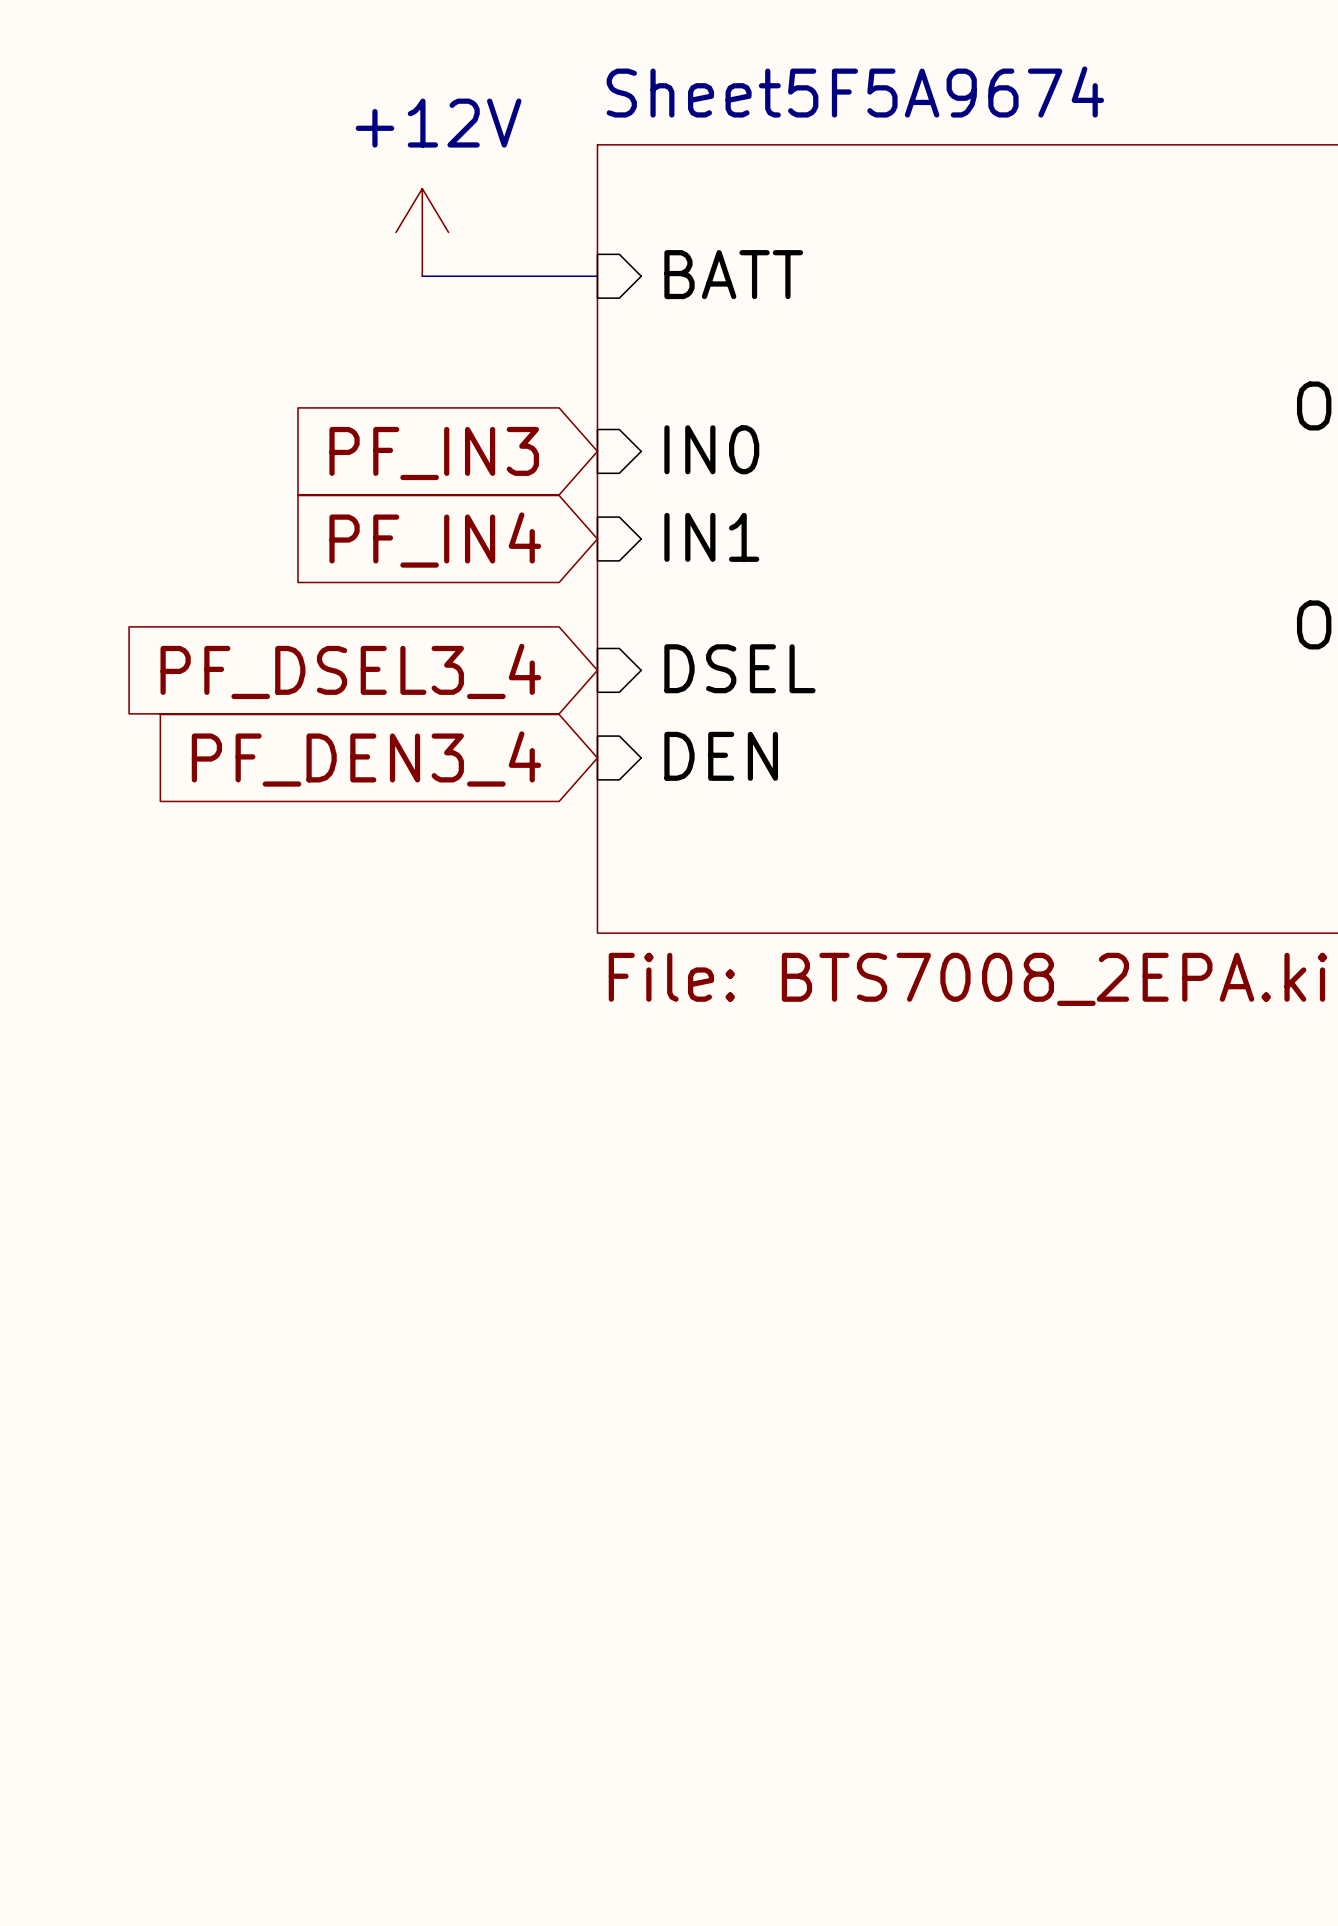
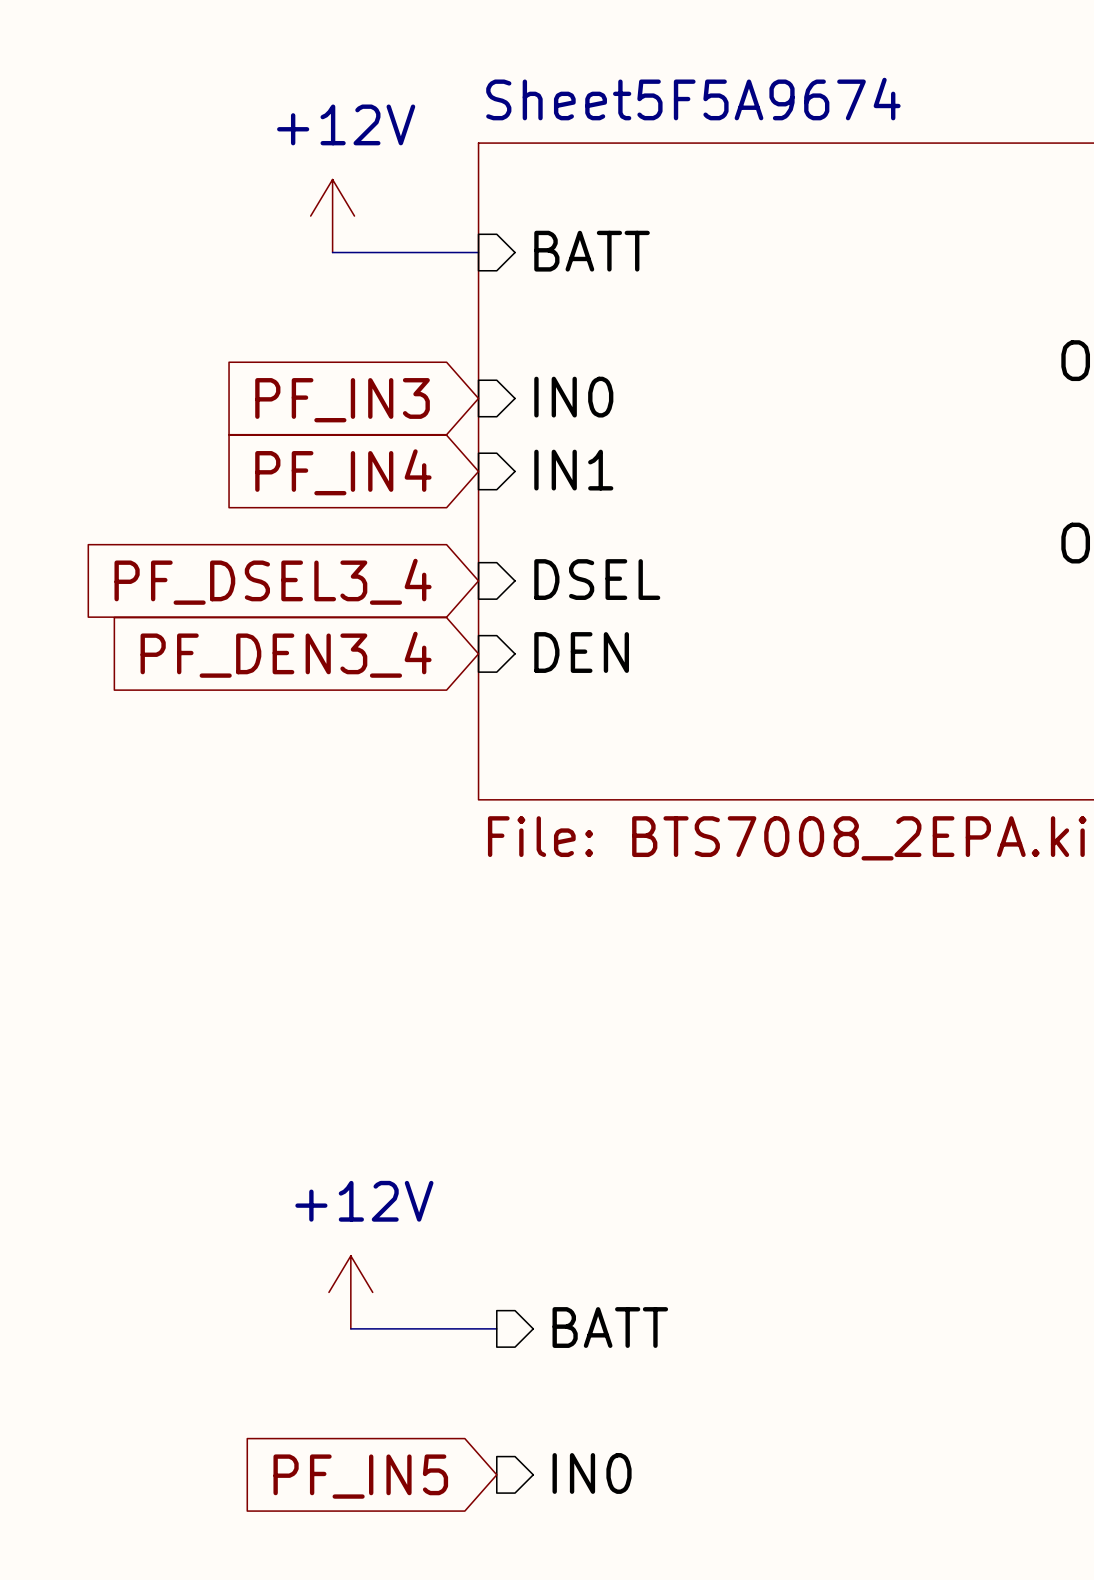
power symbol: none -> +12V (350, 1292)
sheet pin: none -> BATT (610, 1327)
wire: none -> (350, 1328) (496, 1328)
sheet pin: none -> IN0 (592, 1473)
global label: none -> PF_IN5 (360, 1476)

